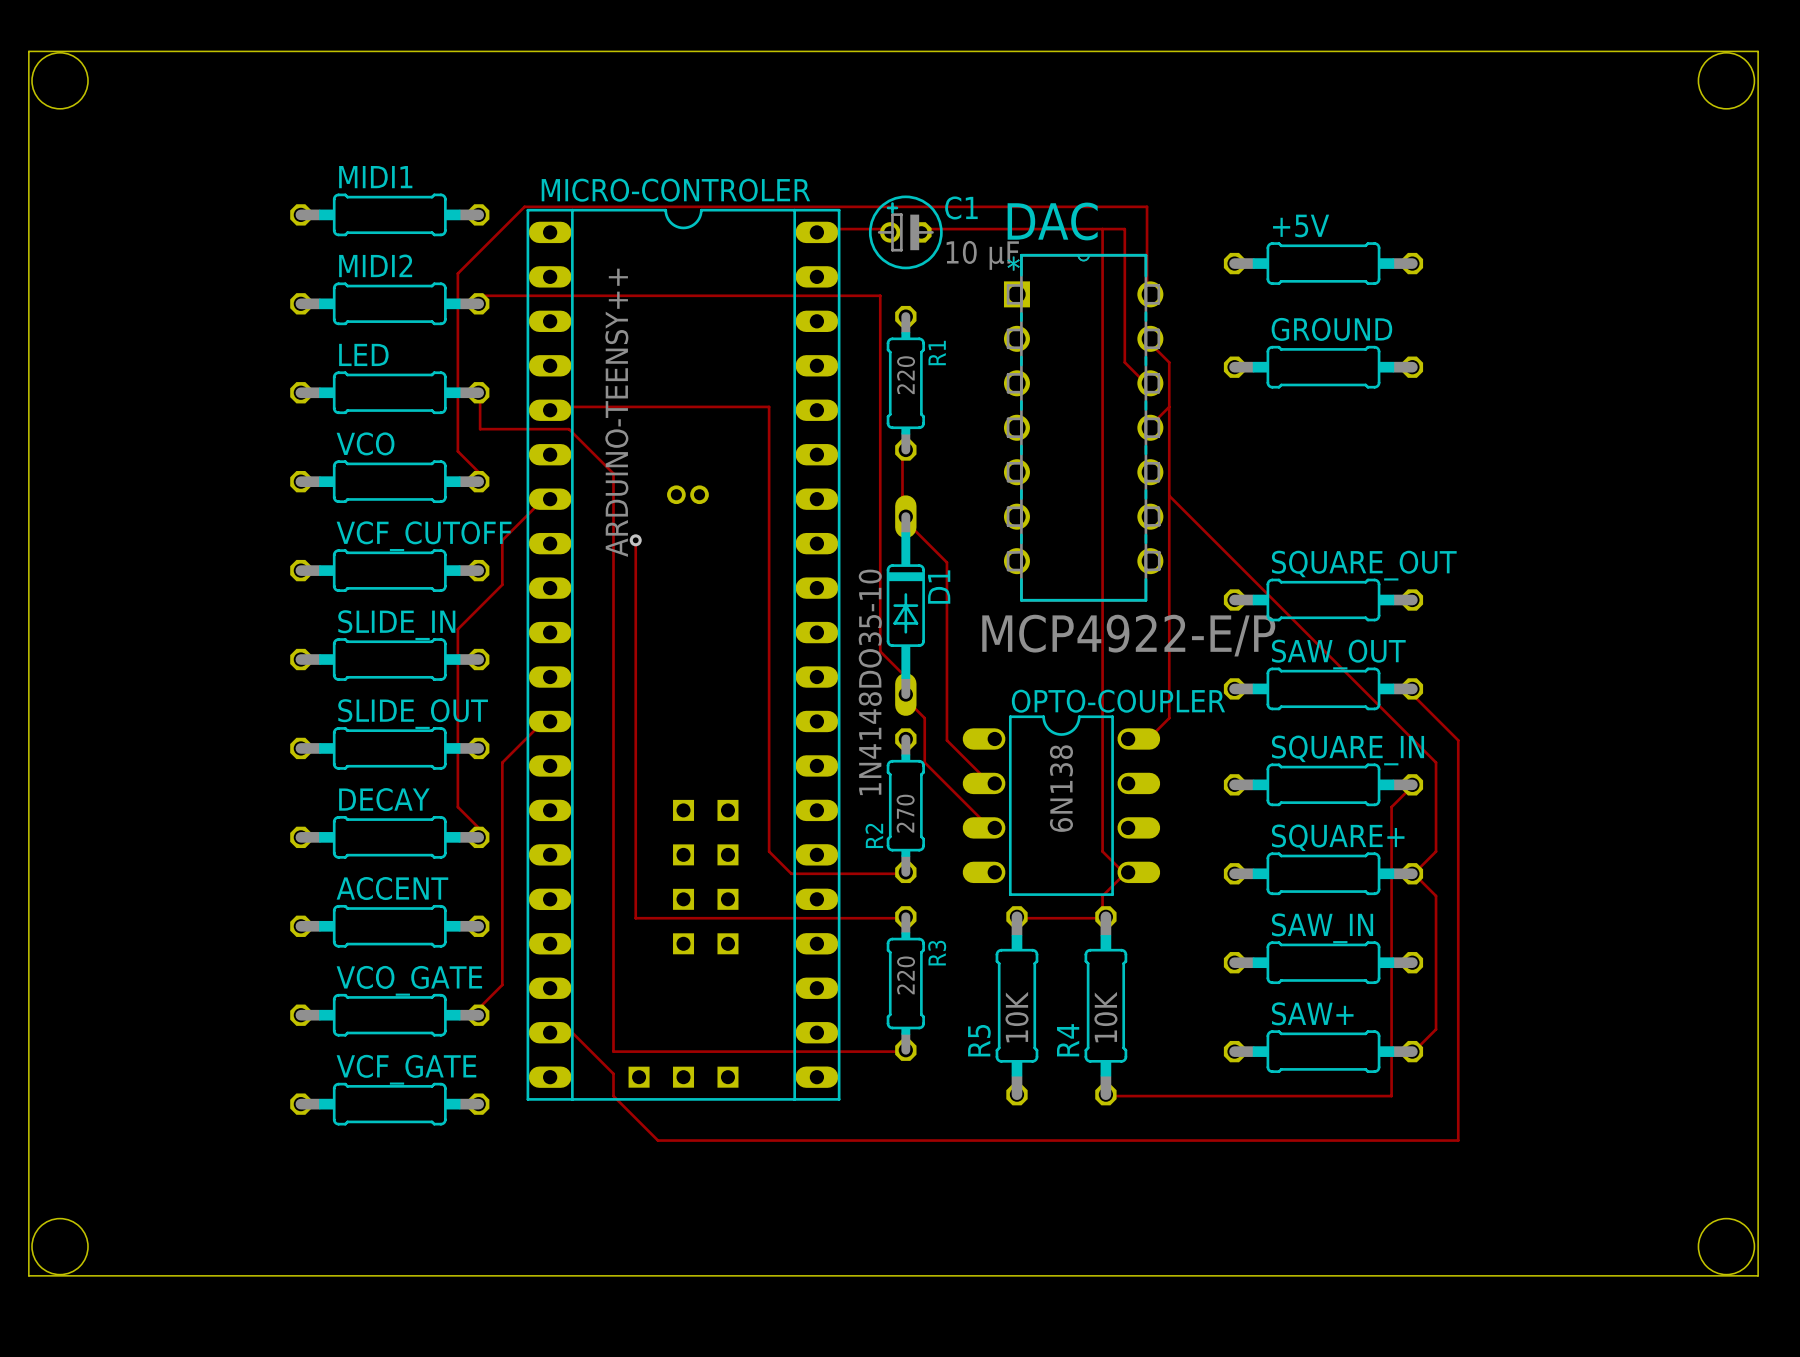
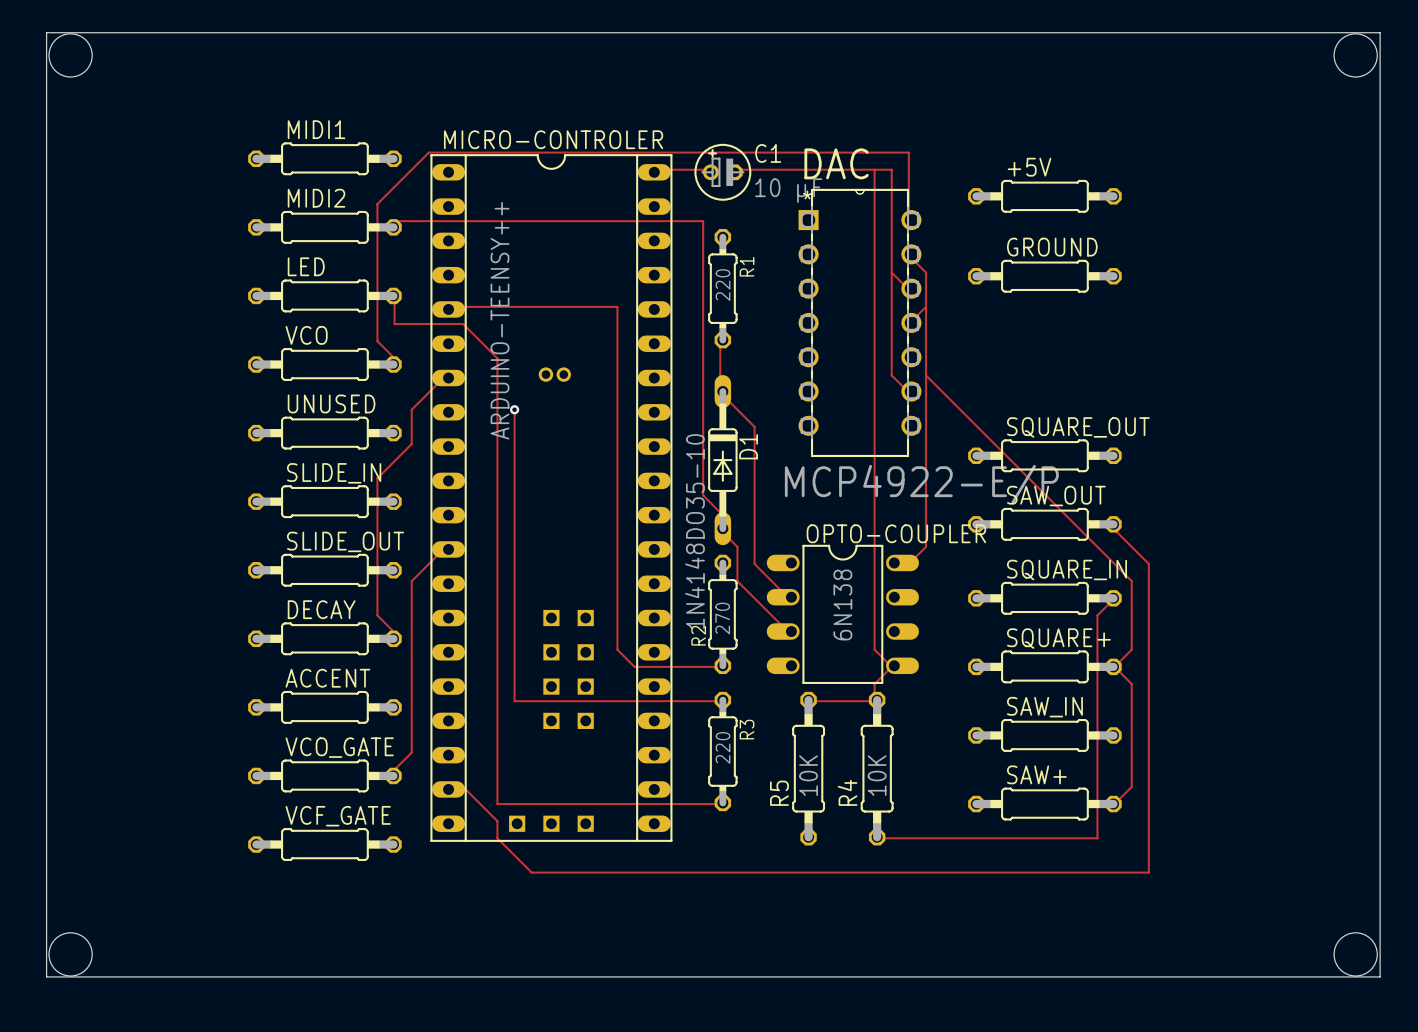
track: none -> (891, 272) (891, 375) (908, 392) (911, 391)
VCF_CUTOFF name: VCF_CUTOFF (424, 536) -> UNUSED (331, 403)

